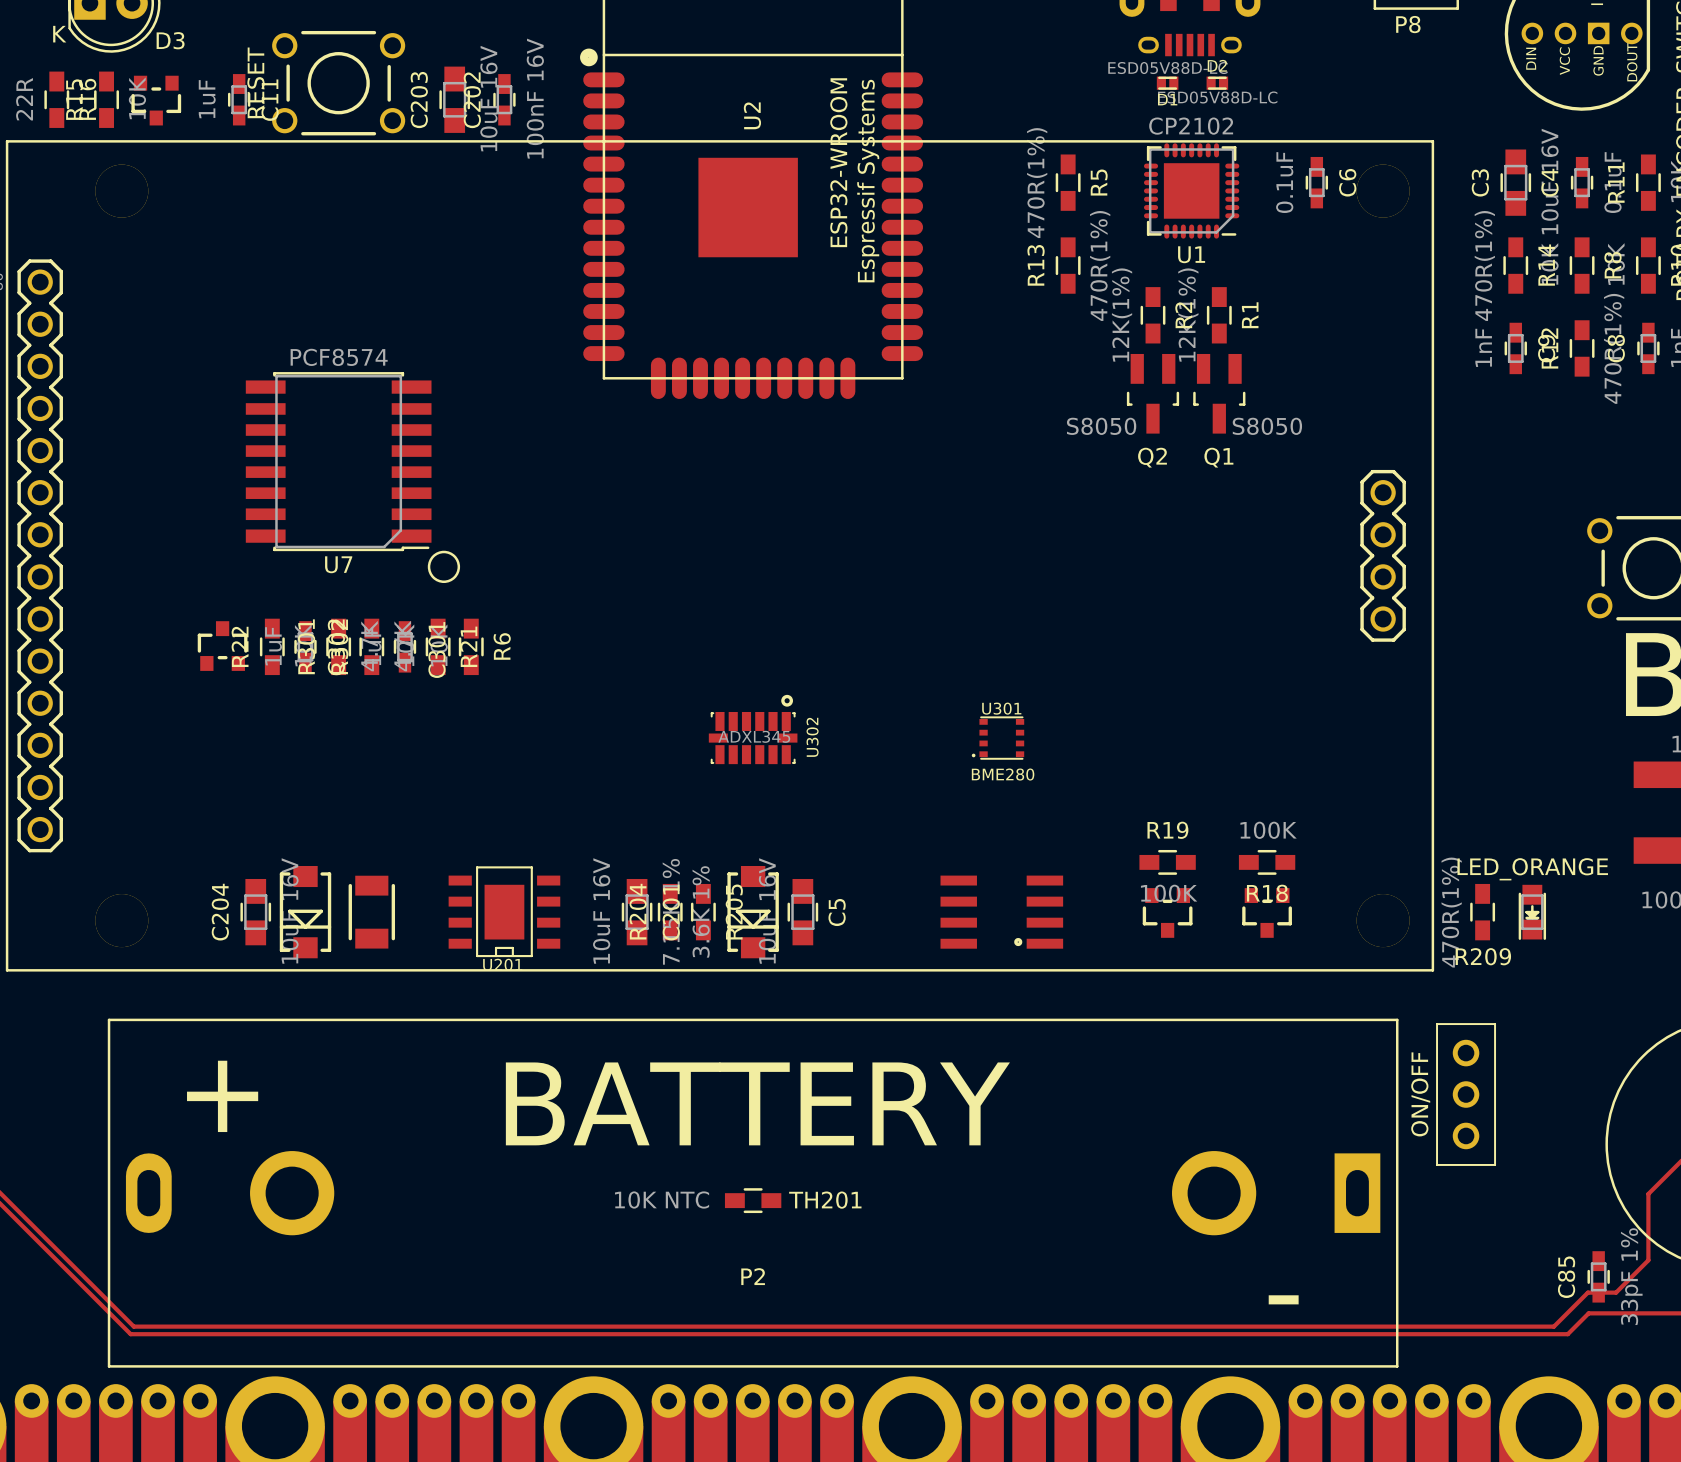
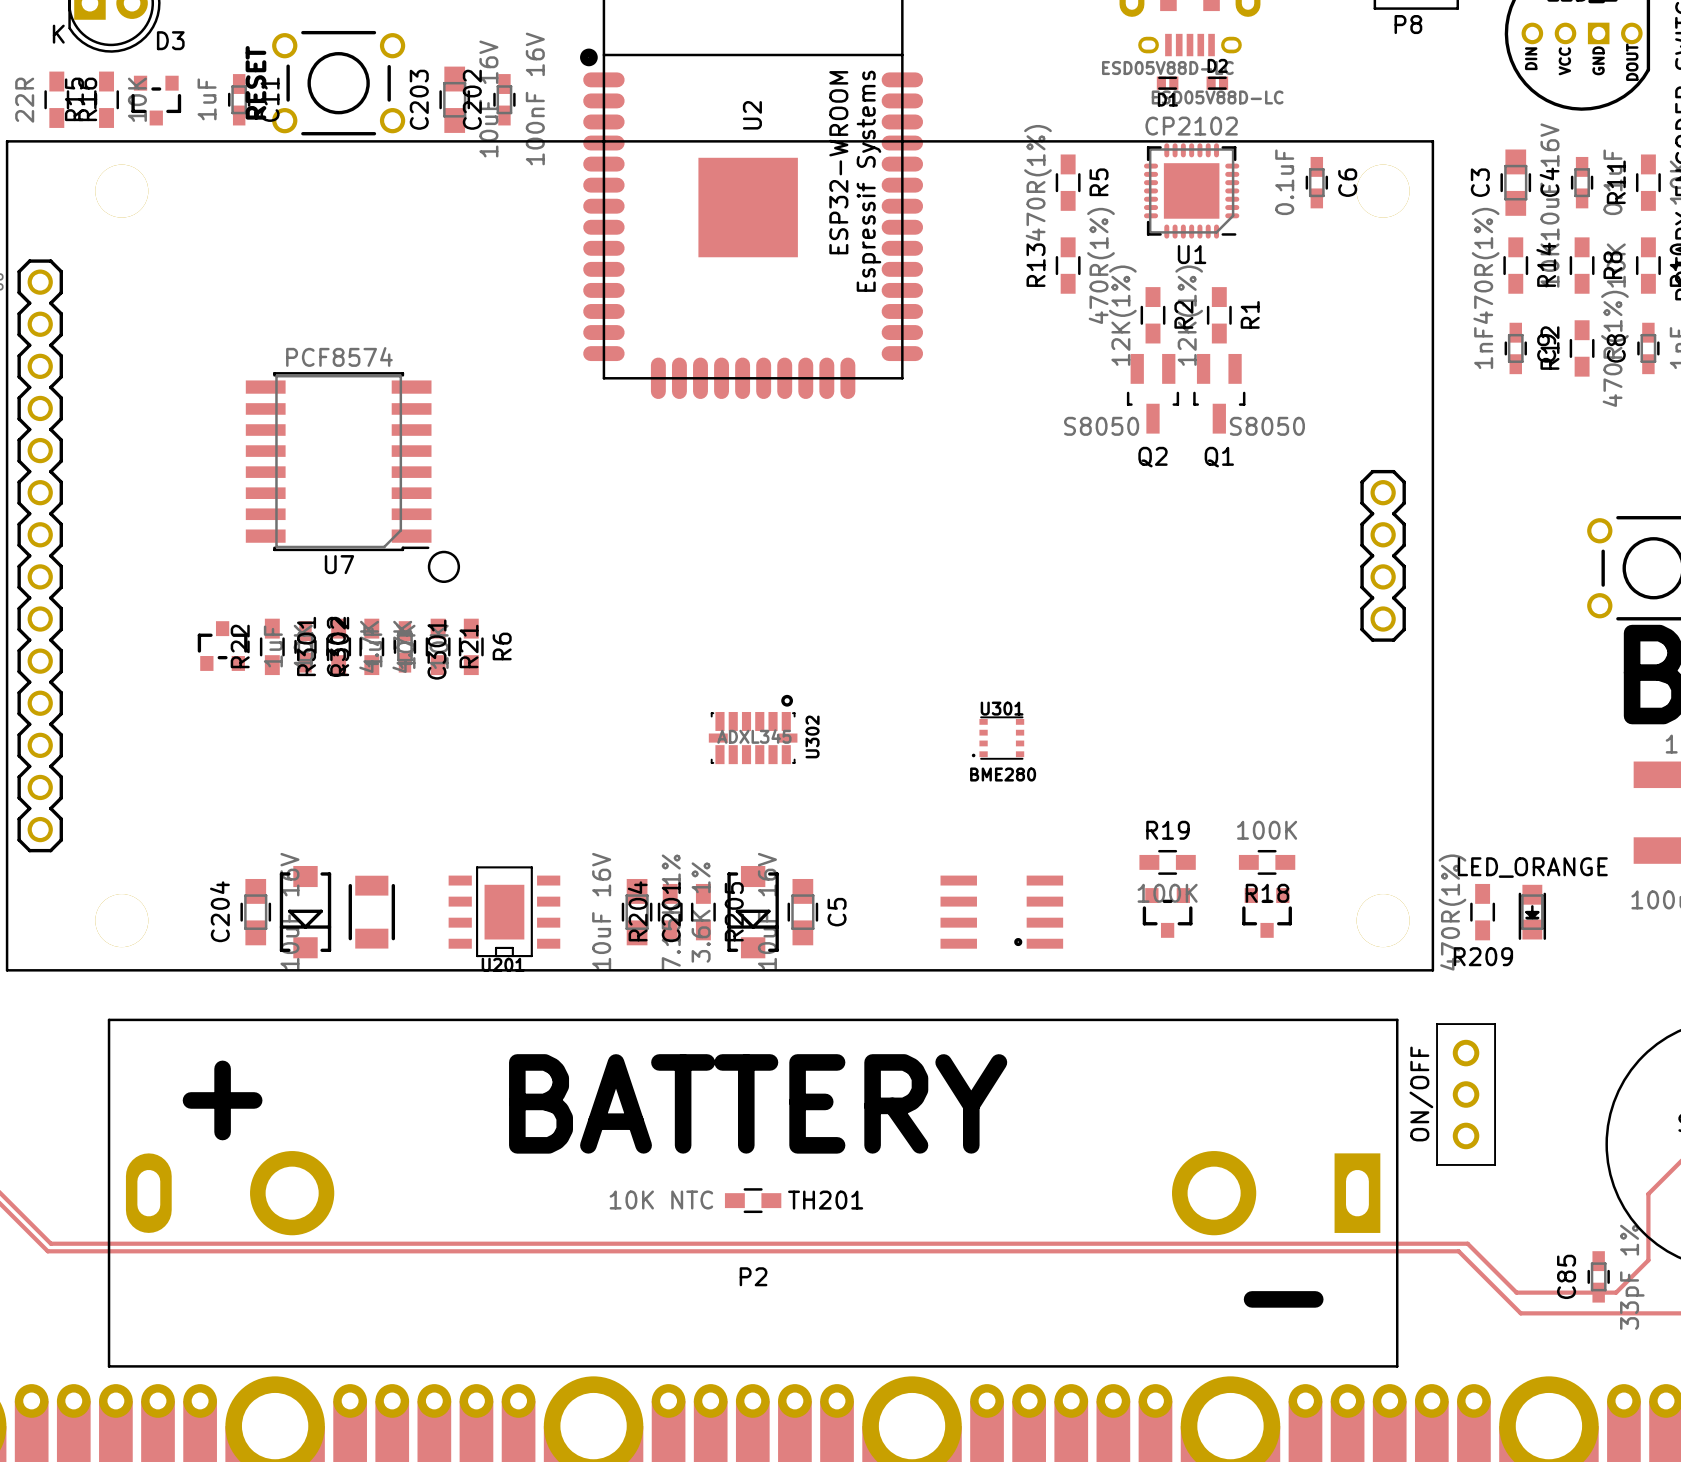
track: (50, 1243) (133, 1326) (1553, 1326) (1587, 1292) -> (50, 1243) (1467, 1243) (1516, 1292) (1587, 1292)
track: (47, 1251) (130, 1334) (1567, 1334) (1588, 1313) -> (47, 1251) (1458, 1251) (1520, 1313) (1588, 1313)

